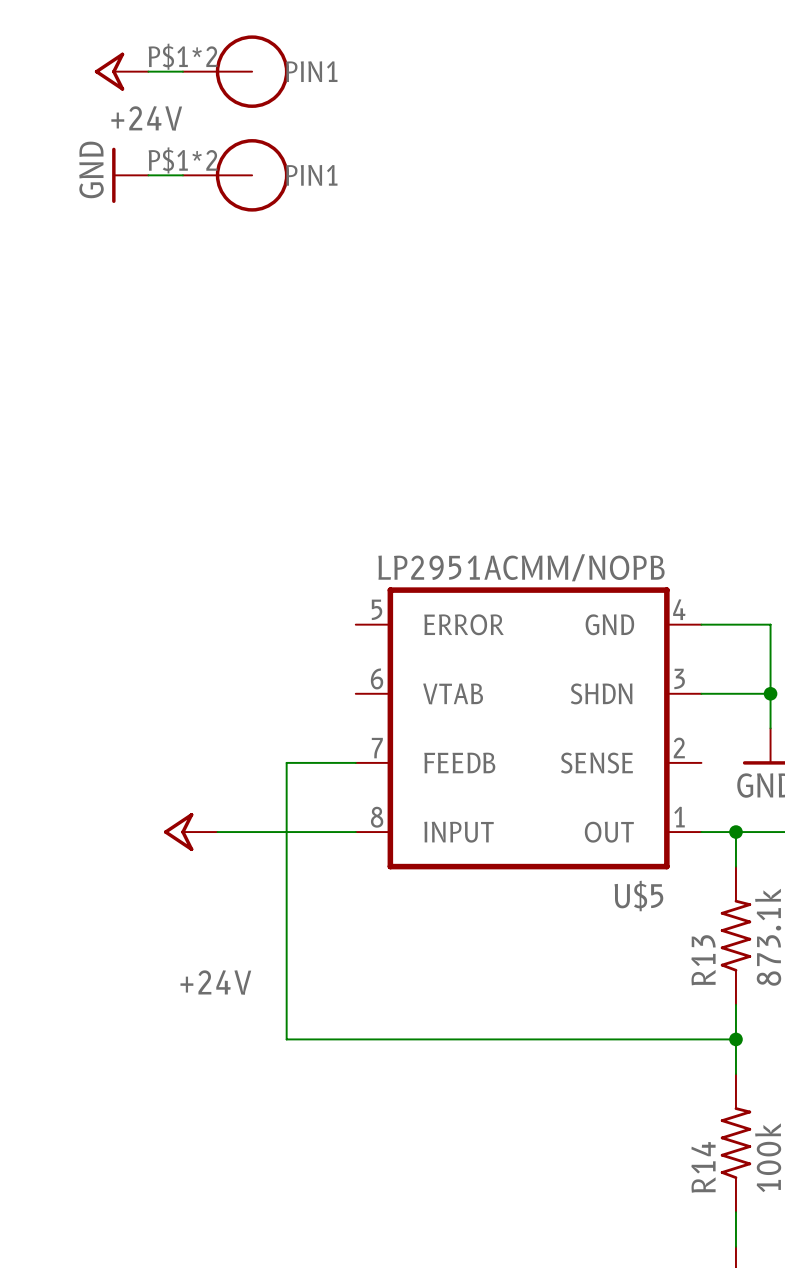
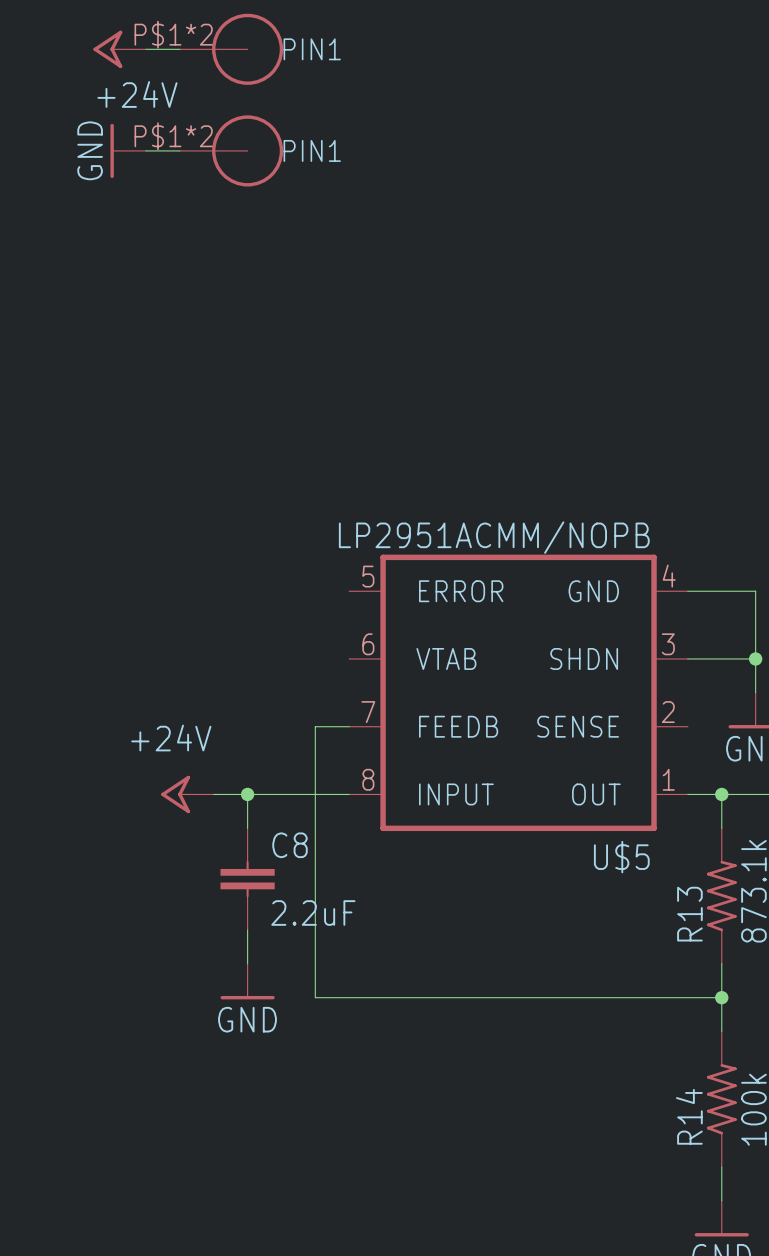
wire: (321, 762) (286, 762) (286, 1039) (321, 1039) -> (315, 726) (315, 997)
wire: none -> (247, 794) (247, 828)
junction: none -> (247, 794)
C8: none -> 2.2uF (247, 879)
wire: none -> (247, 929) (247, 963)
power symbol text position: +24V (215, 982) -> +24V (171, 738)
power symbol: none -> GND (247, 981)

